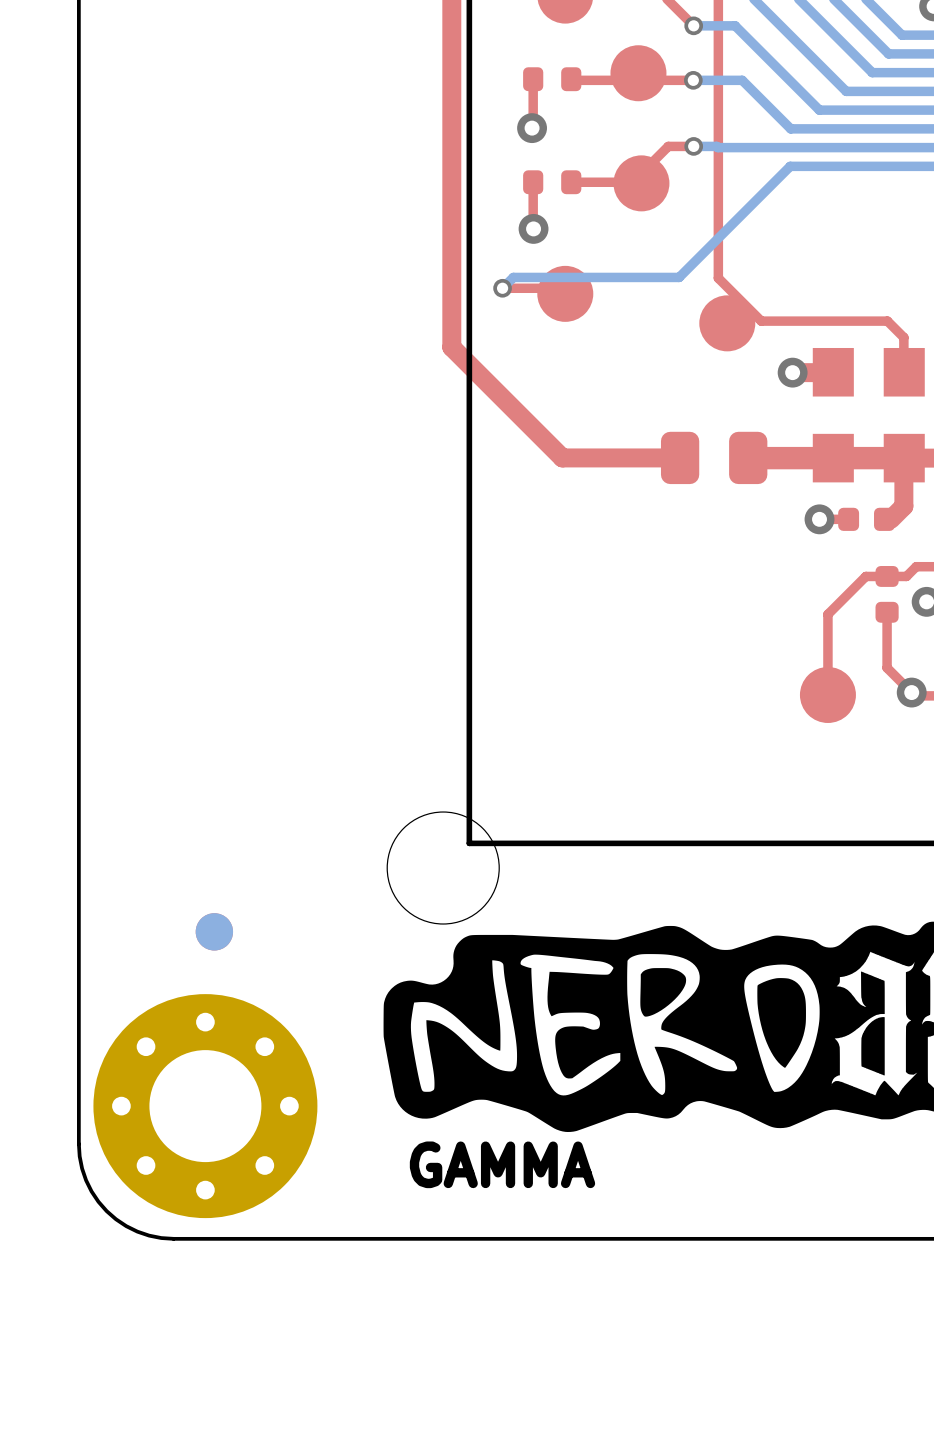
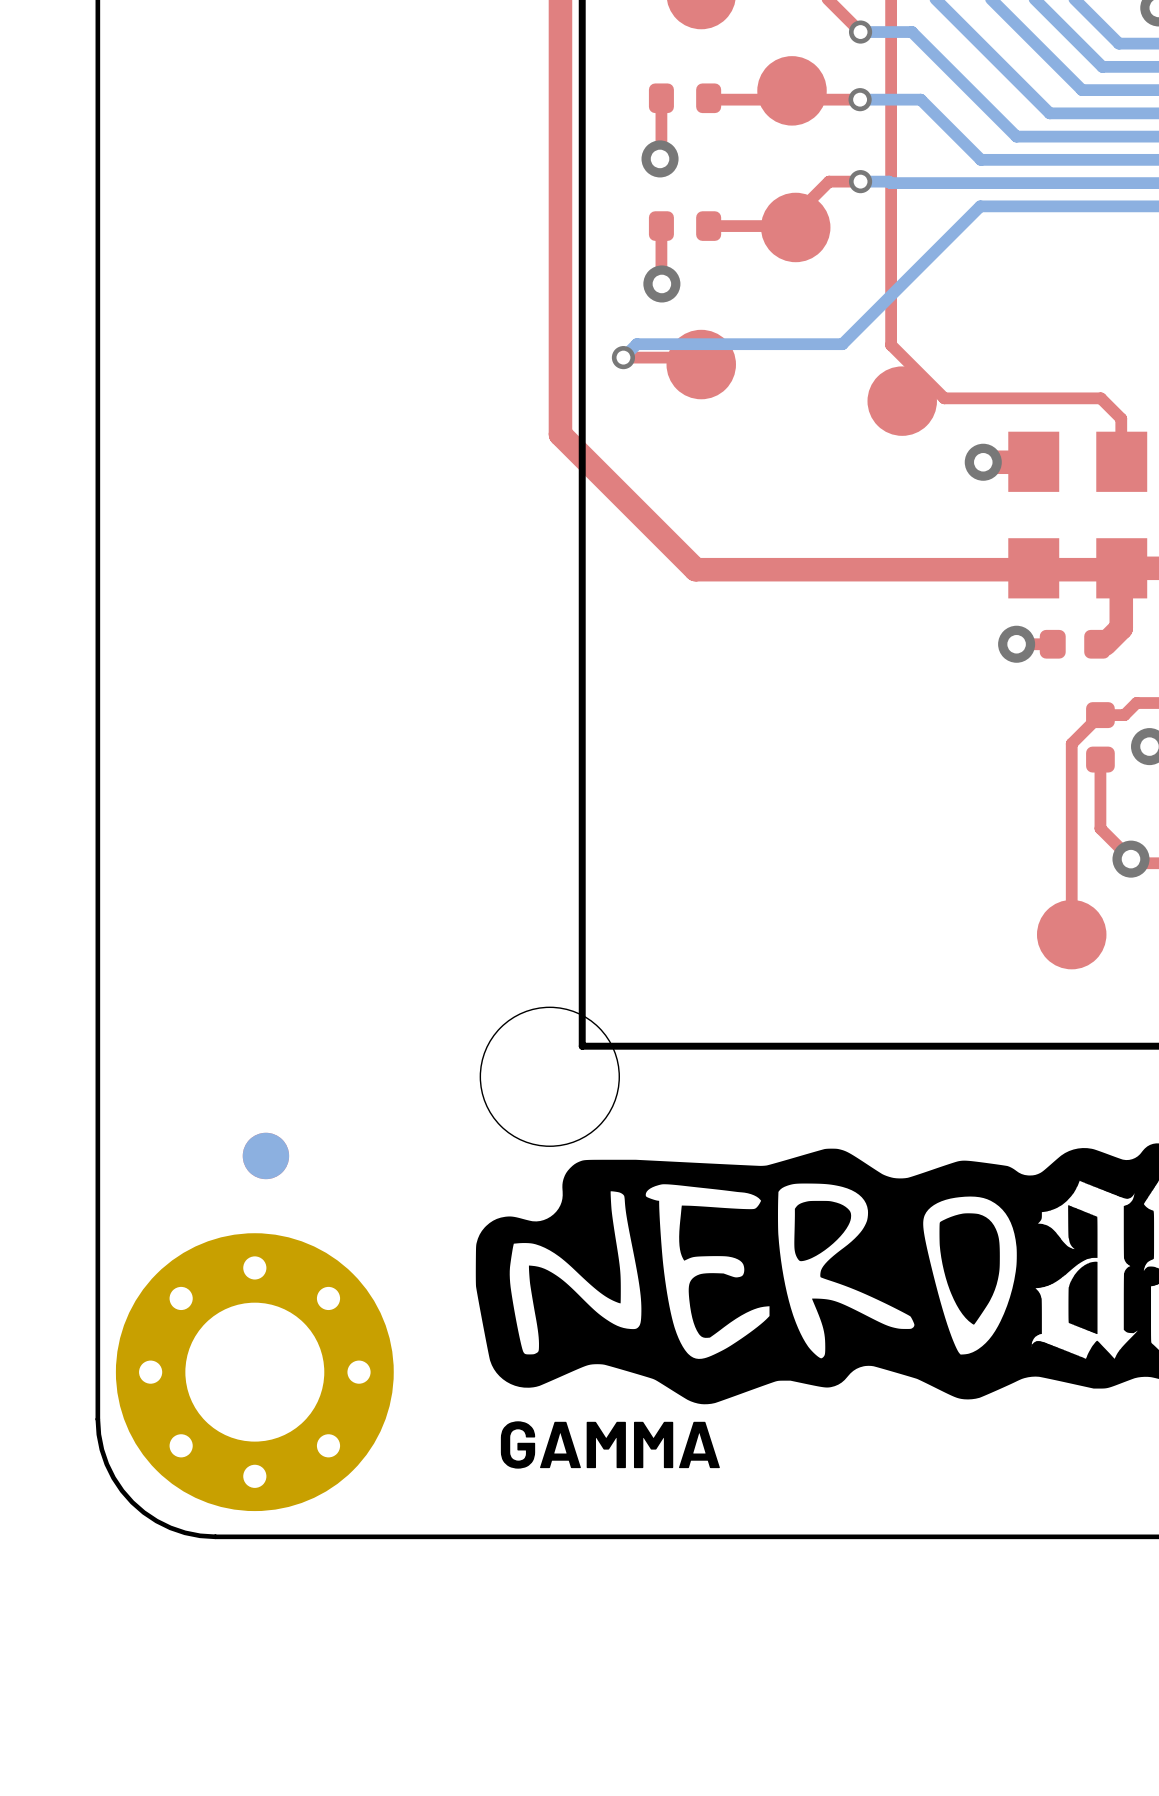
top track: (451, 347) (562, 457) (680, 457) -> (560, 430) (560, 434) (695, 569) (1101, 569)
part: (714, 457) -> none
top track: (904, 458) (748, 458) -> none
top track: (887, 576) (865, 576) (827, 614) (827, 694) -> (1100, 715) (1071, 743) (1071, 934)
part position: (827, 694) -> (1071, 934)

